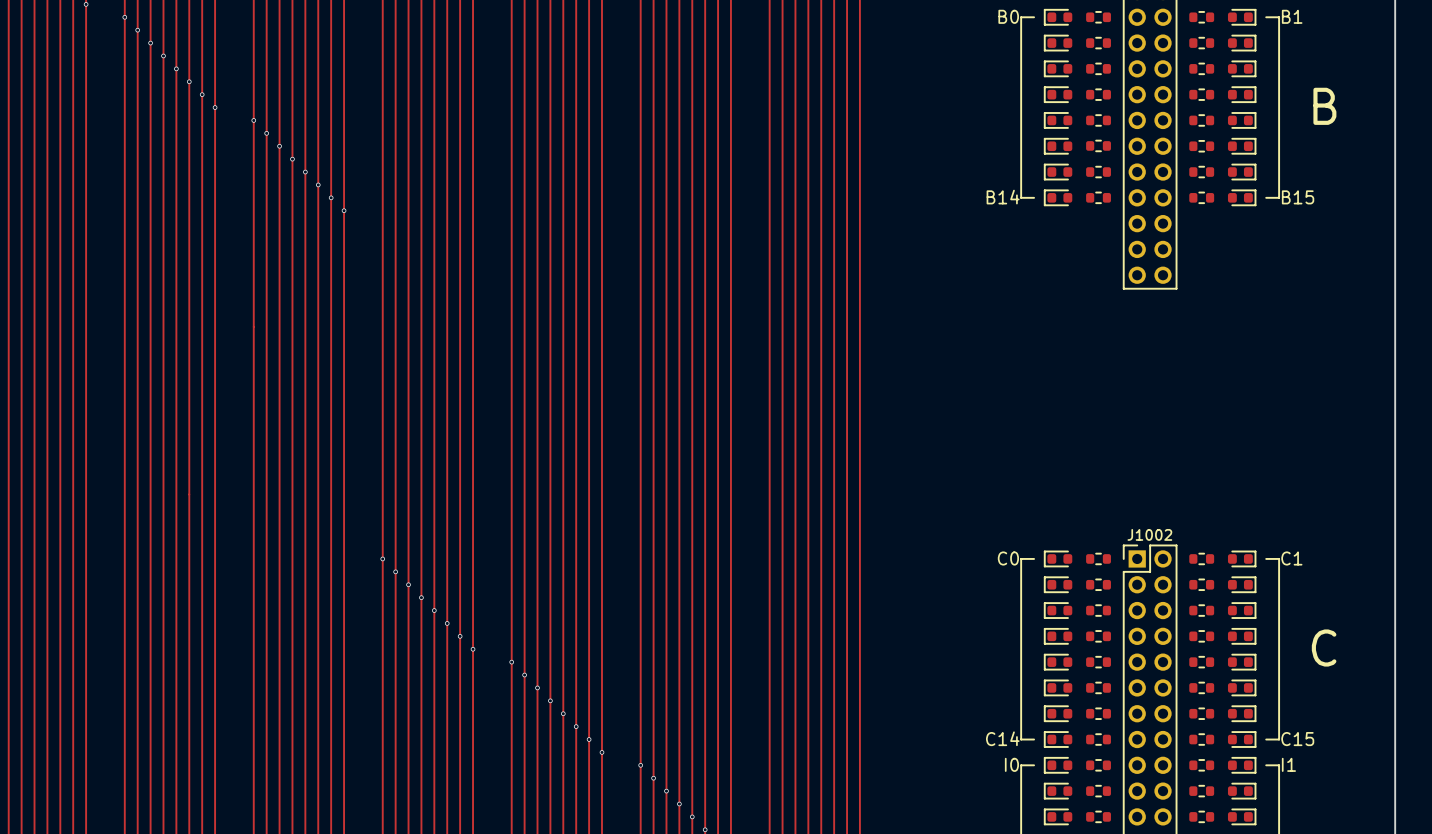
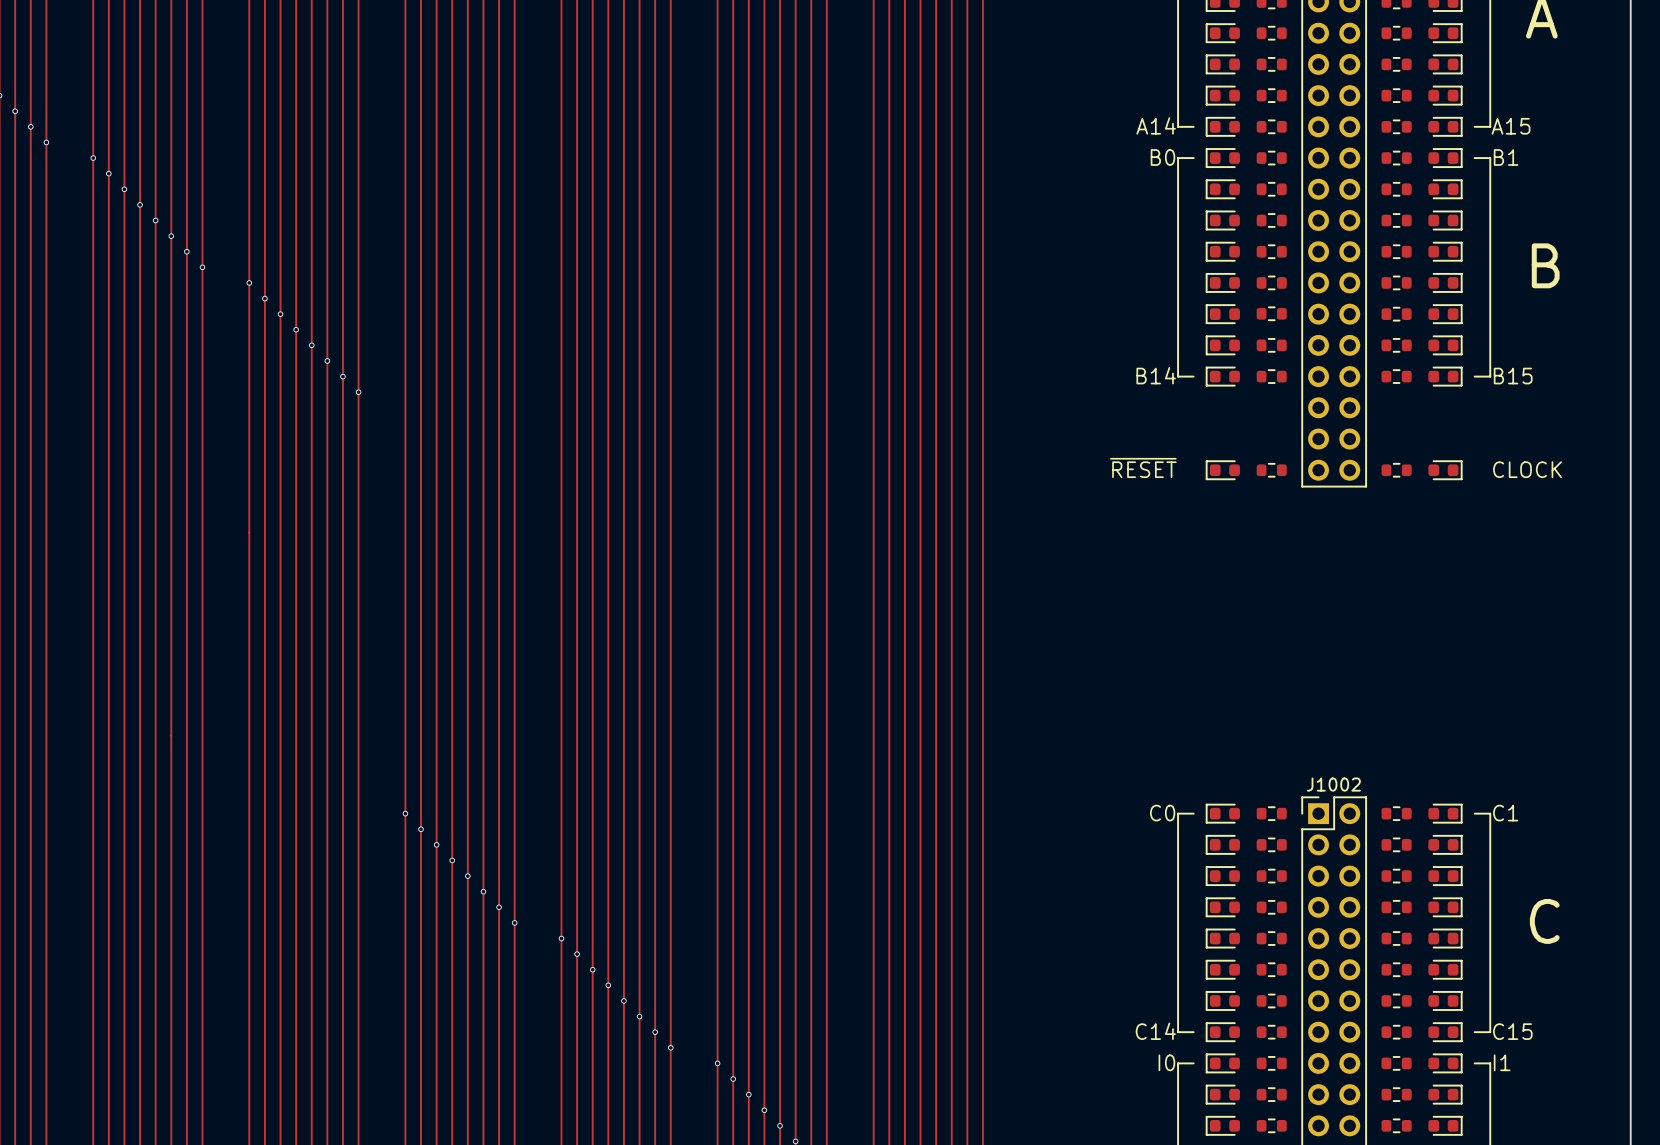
text: none -> ~{RESET} (1143, 467)
text: none -> CLOCK (1527, 469)
part: none -> (1222, 470)
part: none -> (1271, 470)
part: none -> (1396, 470)
part: none -> (1445, 470)

